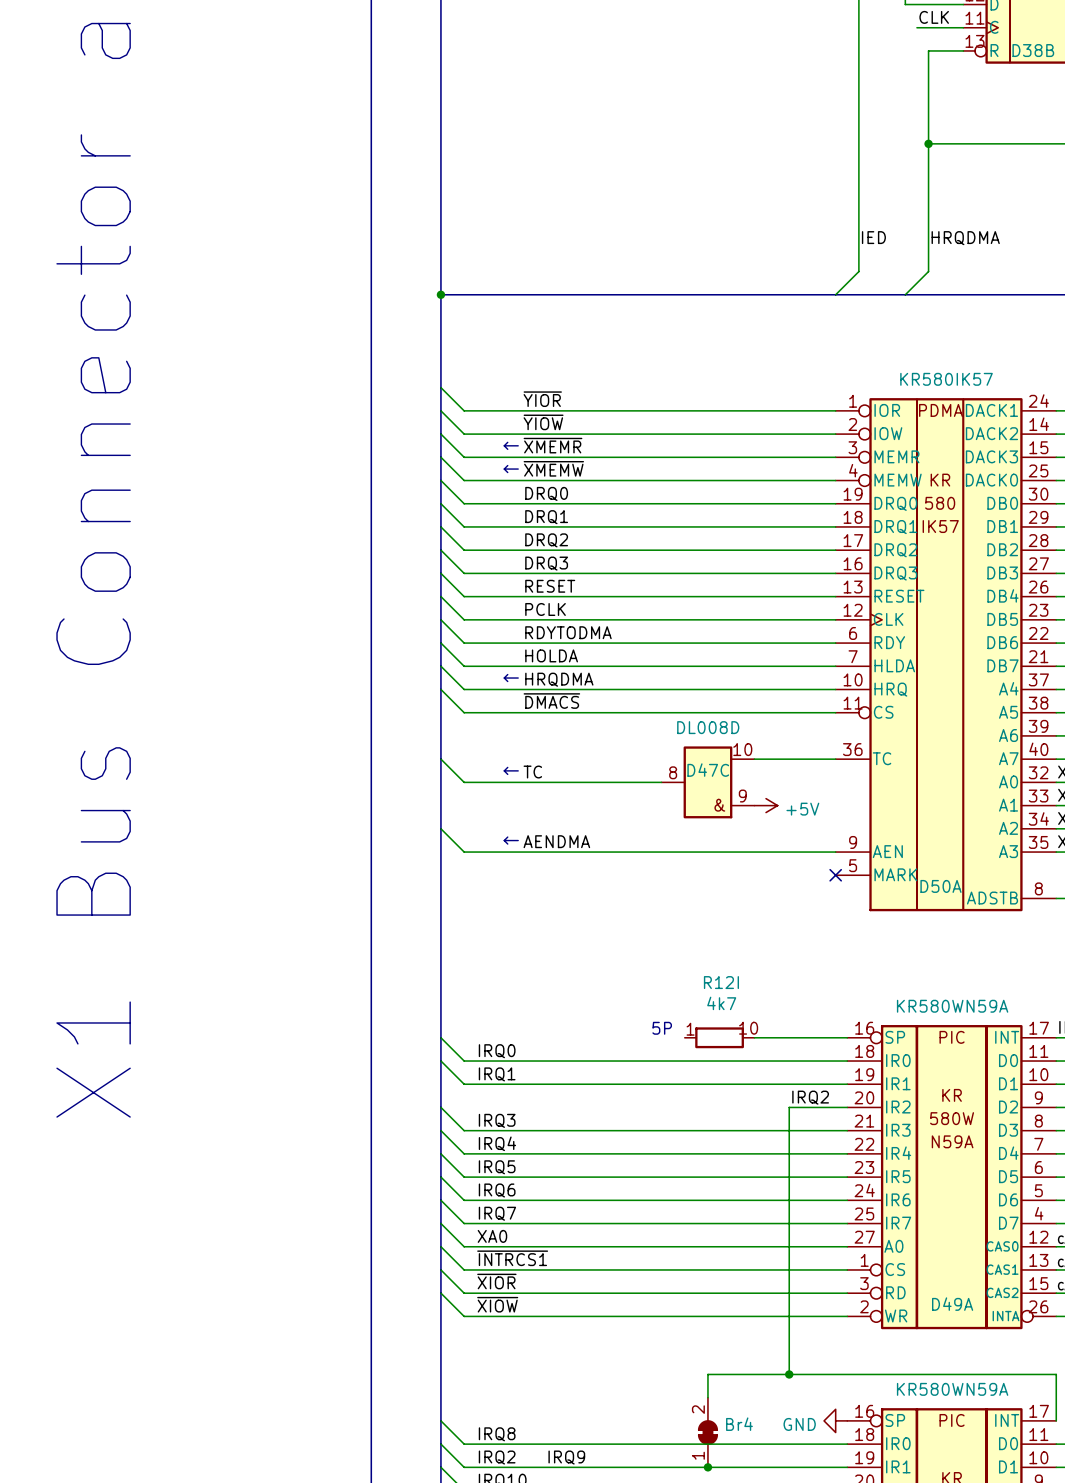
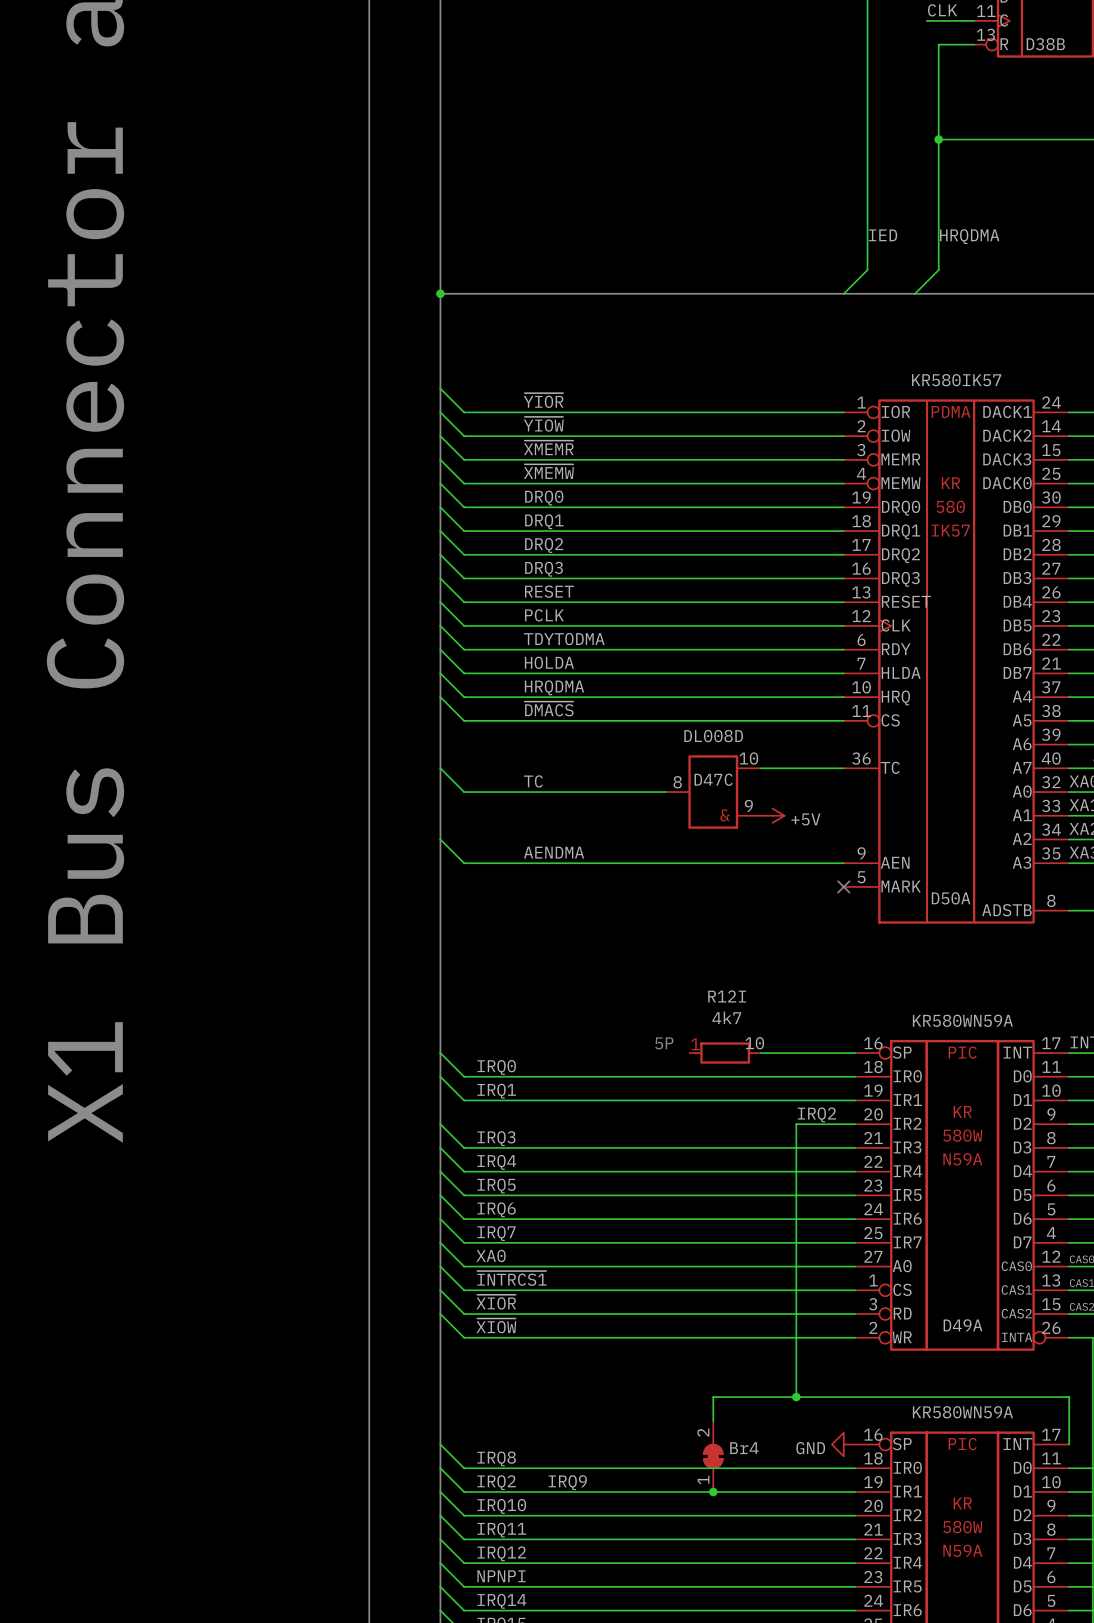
text: ← (511, 445) -> none
text: ← (511, 469) -> none
label: RDYTODMA (568, 632) -> TDYTODMA (564, 639)
text: ← (511, 678) -> none
text: ← (511, 770) -> none
text: ← (511, 840) -> none

